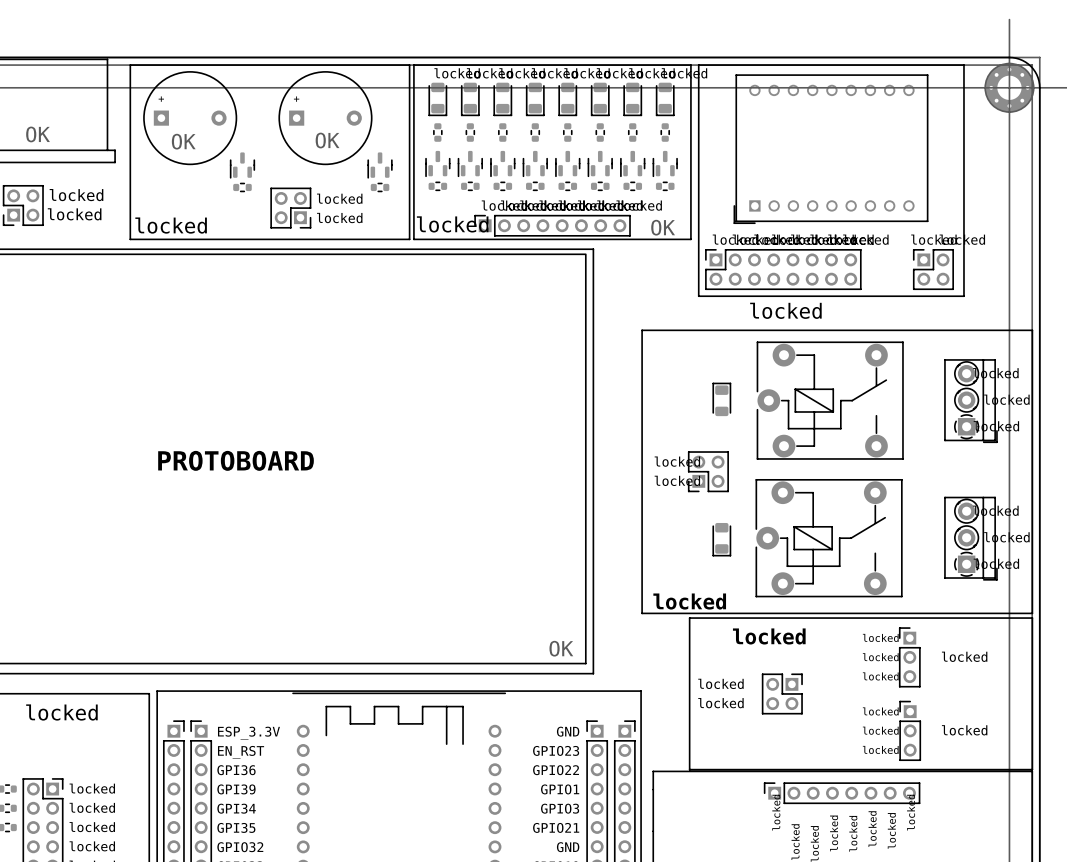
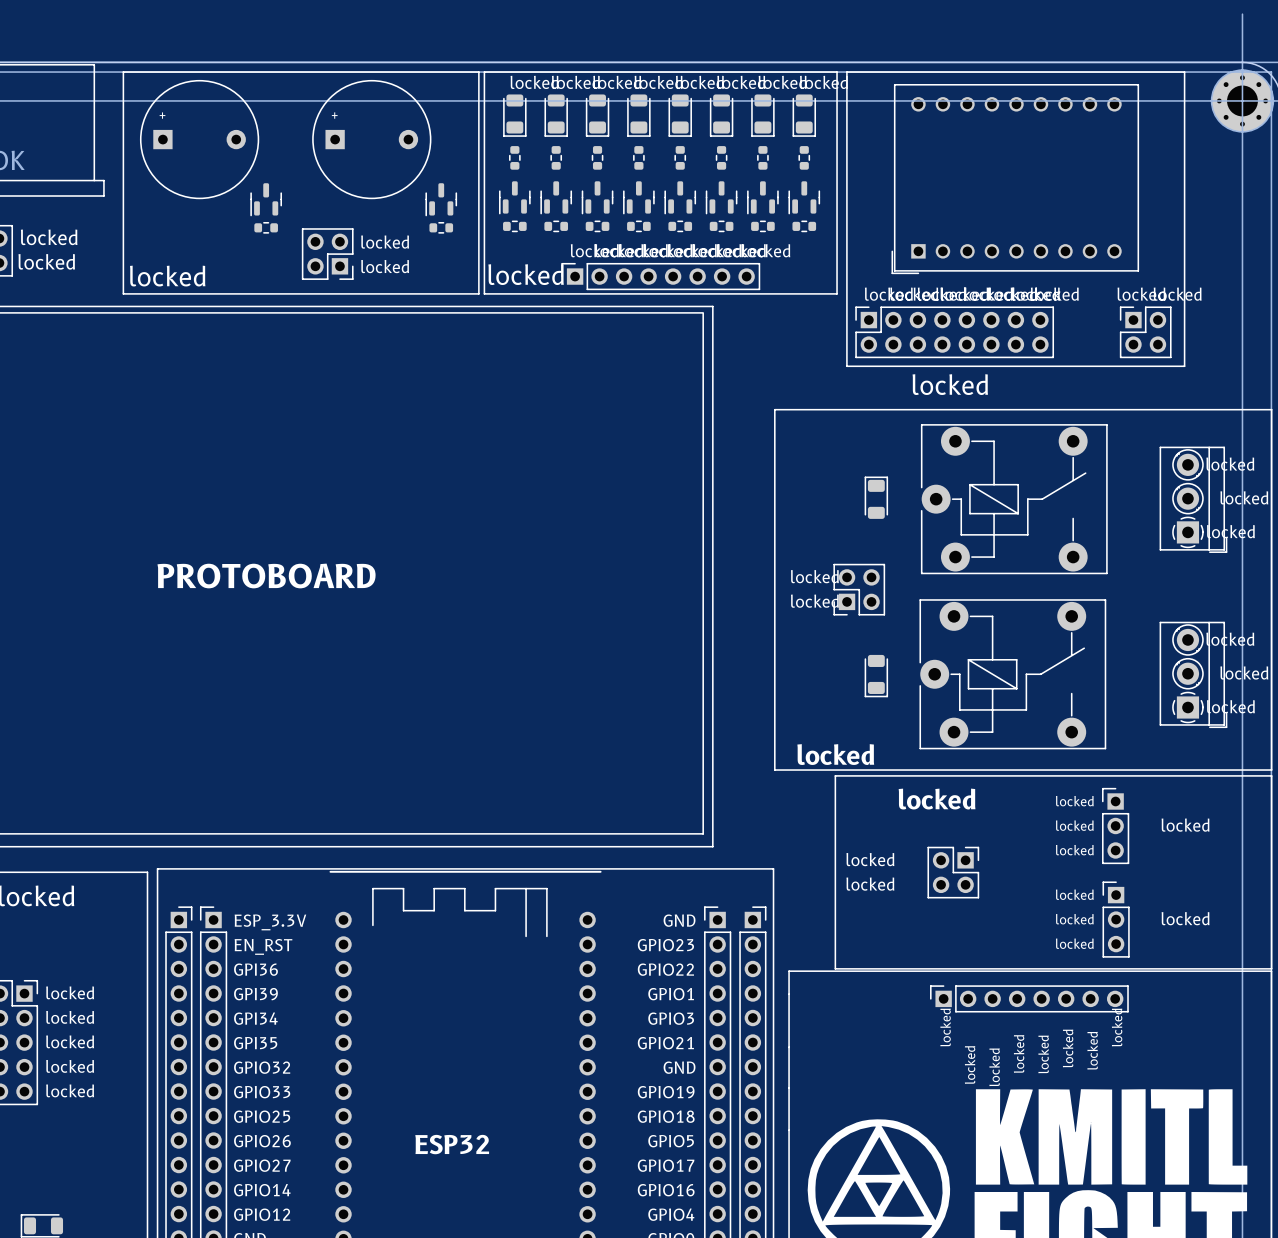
text: OK (327, 140) -> none
text: OK (183, 141) -> none
text: OK (663, 227) -> none
text: OK (561, 648) -> none

